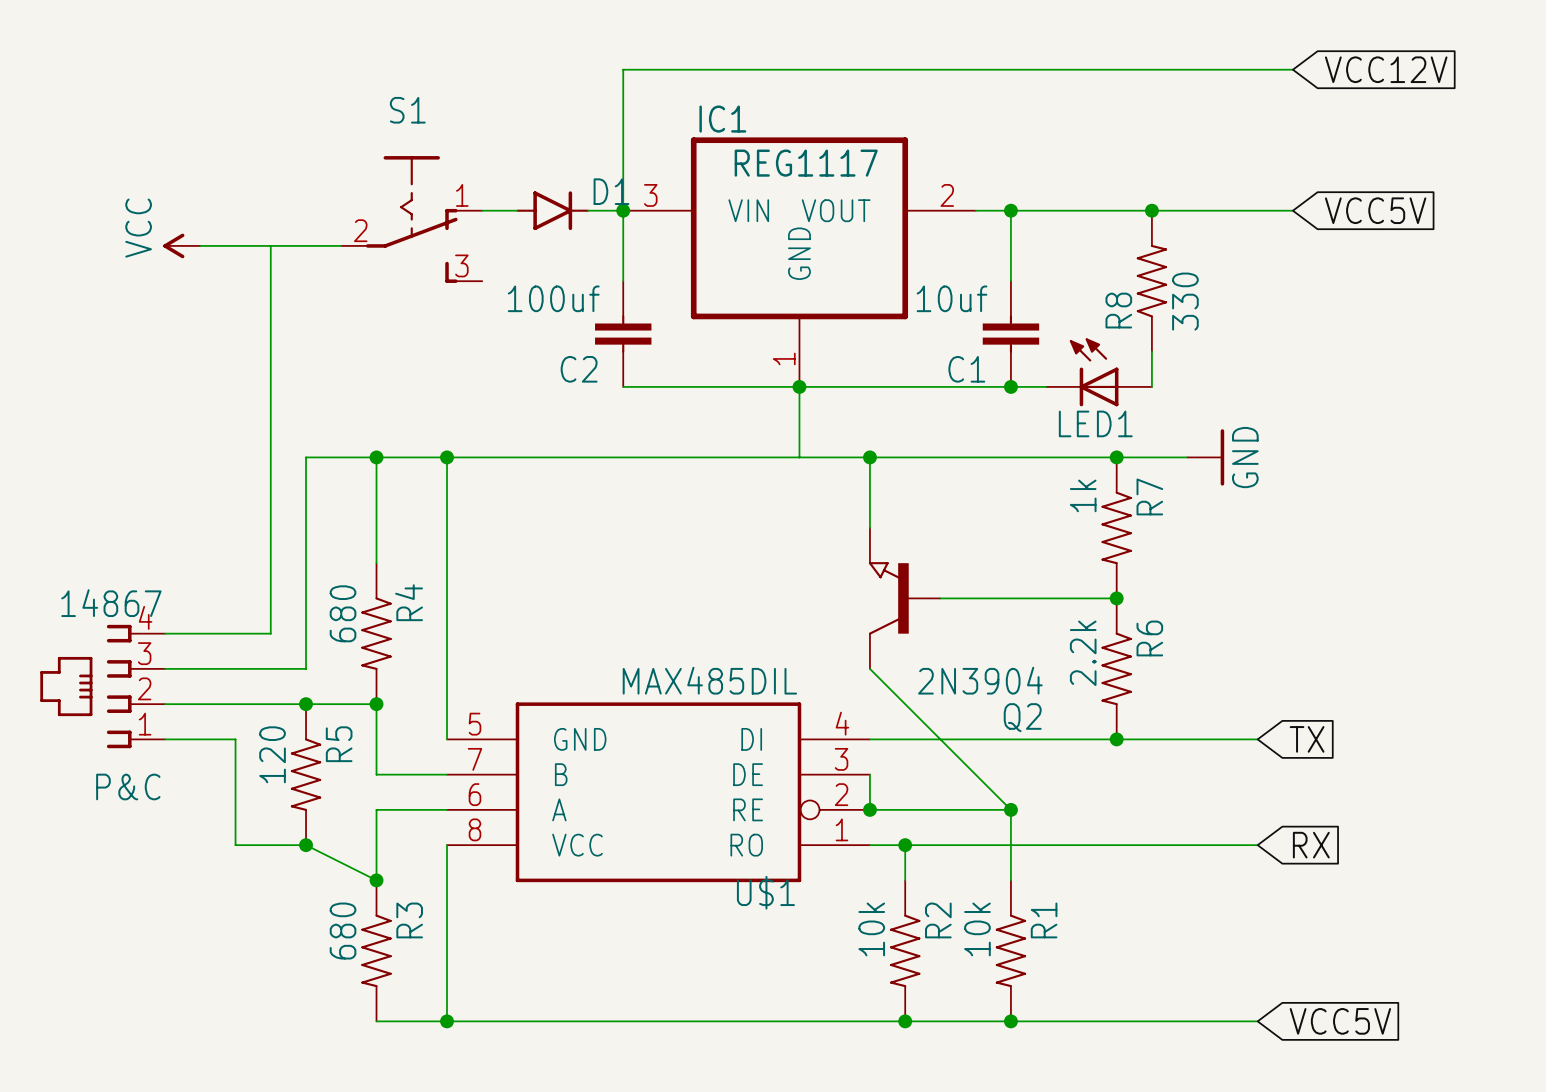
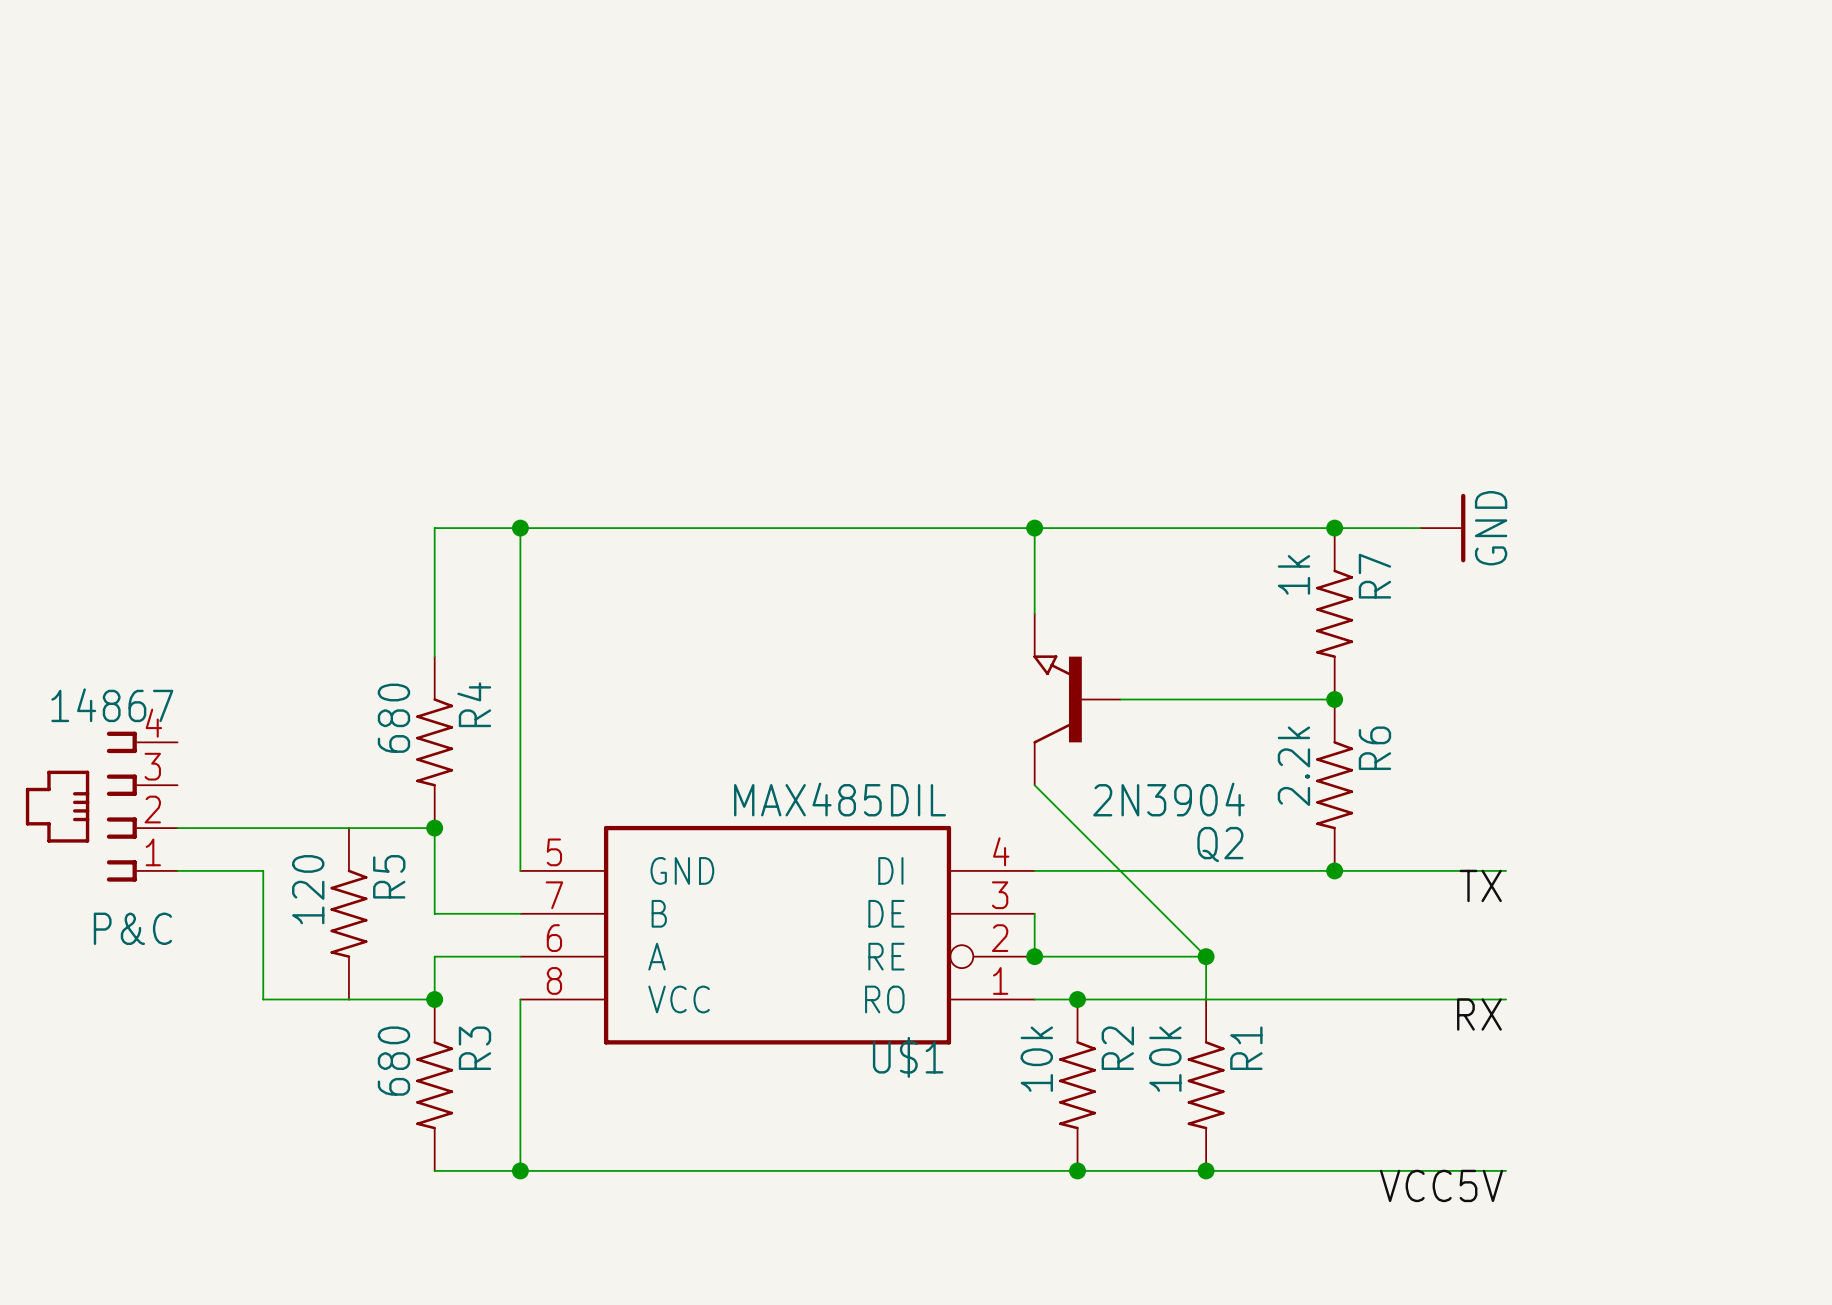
wire: (1292, 69) (623, 69) (623, 281) -> none
global label: VCC12V (1386, 69) -> none
wire: (482, 210) (517, 210) -> none
D1: (552, 210) -> none
wire: (587, 210) (623, 210) -> none
junction: (623, 210) -> none
wire: (975, 210) (1292, 210) -> none
wire: (1010, 210) (1010, 281) -> none
junction: (1010, 210) -> none
junction: (1151, 210) -> none
global label: VCC5V (1375, 210) -> none
S1: (411, 219) -> none
power symbol: VCC (181, 245) -> none
wire: (200, 245) (341, 245) -> none
wire: (270, 245) (270, 633) (165, 633) -> none
IC1: REG1117 (799, 262) -> none
R8: 330 (1151, 281) -> none
C2: 100uf (623, 334) -> none
C1: 10uf (1010, 334) -> none
wire: (1151, 351) (1151, 386) -> none
LED1: (1099, 372) -> none
wire: (623, 386) (1046, 386) -> none
wire: (799, 386) (799, 457) -> none
junction: (799, 386) -> none
junction: (1010, 386) -> none
wire: (376, 457) (306, 457) (306, 668) (165, 668) -> none
junction: (376, 457) -> none
junction: (306, 704) -> none
global label: TX (1307, 739) -> none
label: none -> TX (1480, 885)
wire: (306, 845) (376, 880) (376, 845) -> (348, 999) (434, 999)
junction: (306, 845) -> none
junction: none -> (434, 999)
global label: RX (1311, 845) -> none
label: none -> RX (1479, 1014)
junction: (376, 880) -> none
R3 position: (376, 950) -> (434, 1085)
R2 position: (905, 950) -> (1077, 1085)
R1 position: (1010, 950) -> (1206, 1085)
wire: (447, 986) (447, 1021) -> none
label: none -> VCC5V (1441, 1185)
wire: (376, 1021) (1257, 1021) -> (434, 1170) (1506, 1170)
junction position: (447, 1021) -> (520, 1170)
junction position: (905, 1021) -> (1077, 1170)
junction position: (1010, 1021) -> (1206, 1170)
global label: VCC5V (1340, 1021) -> none

